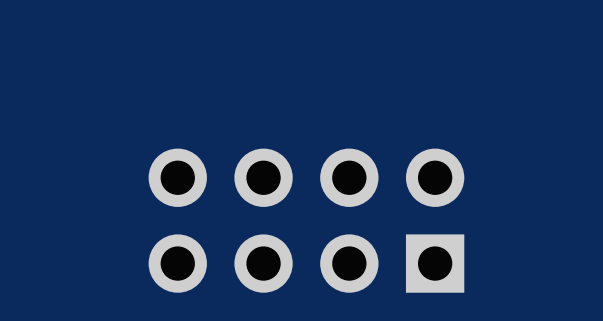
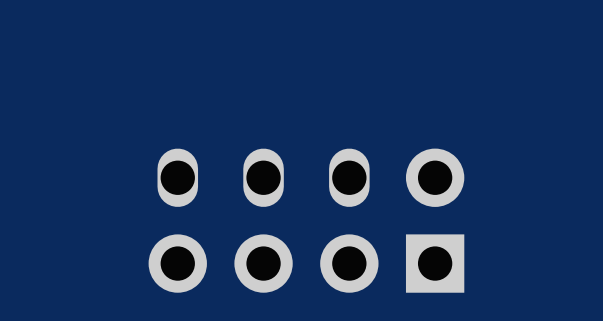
part footprint: [148, 148, 465, 293] -> [148, 148, 465, 293]

